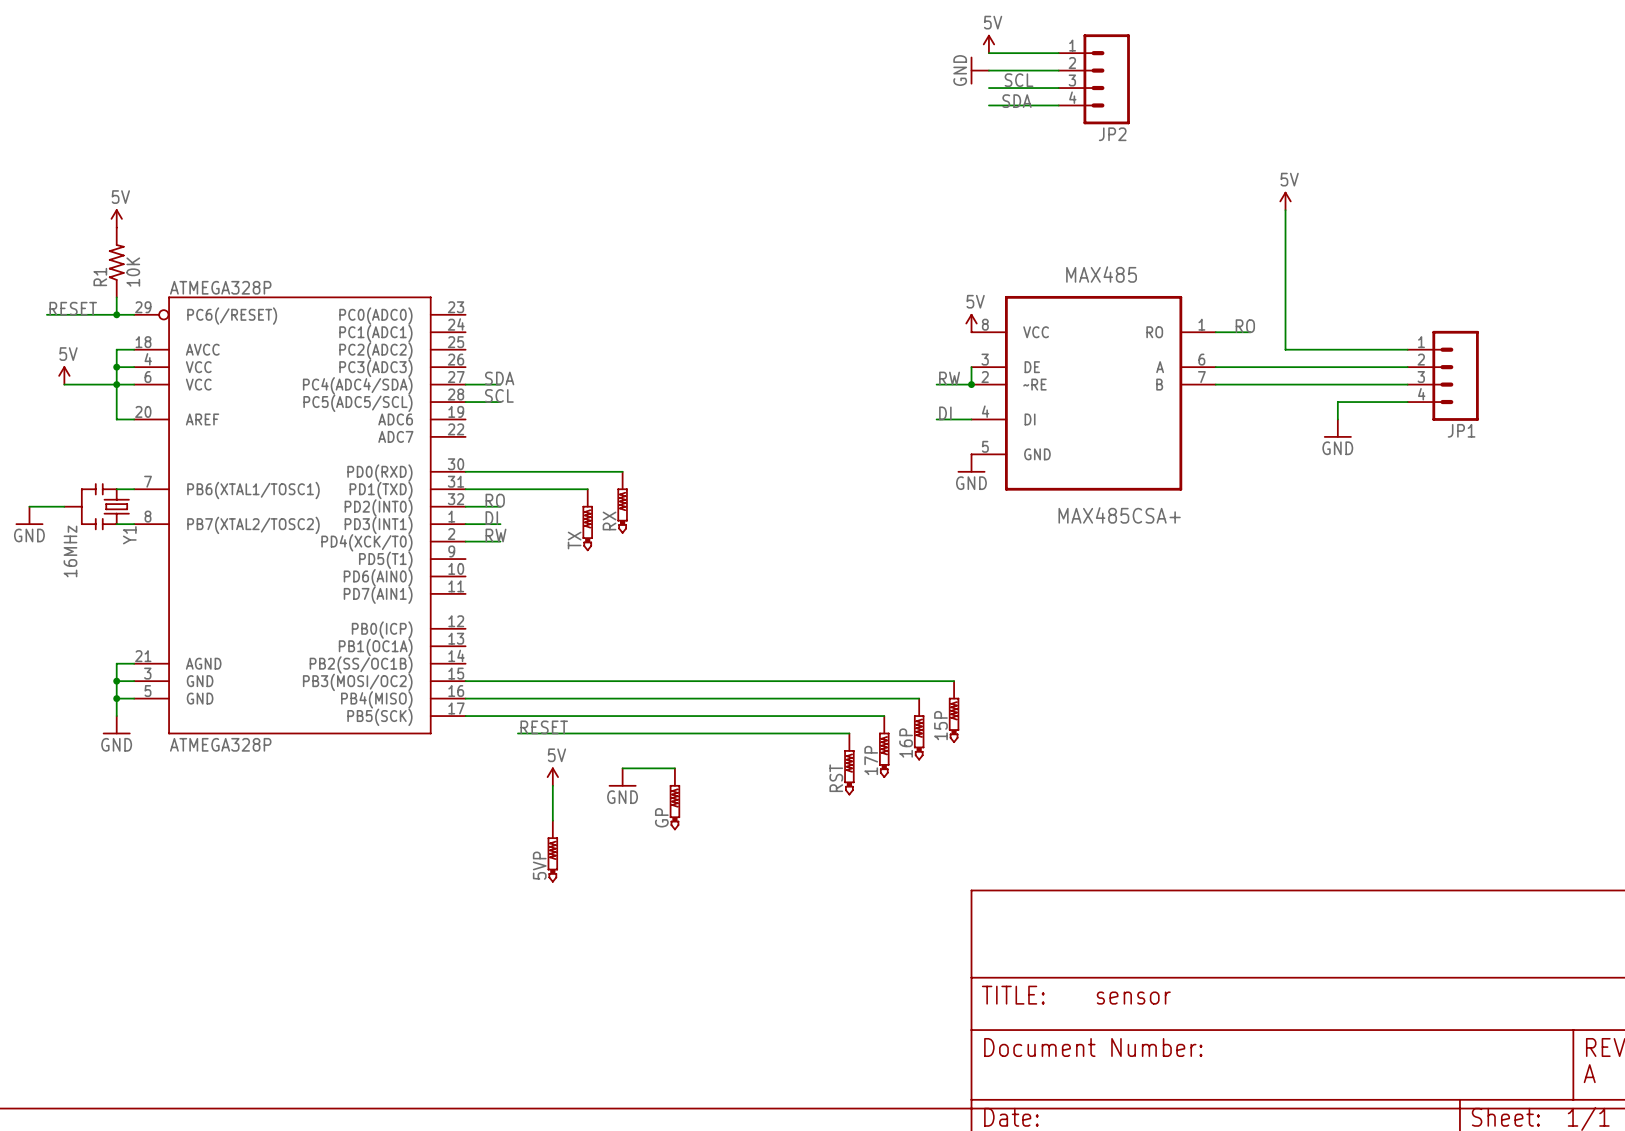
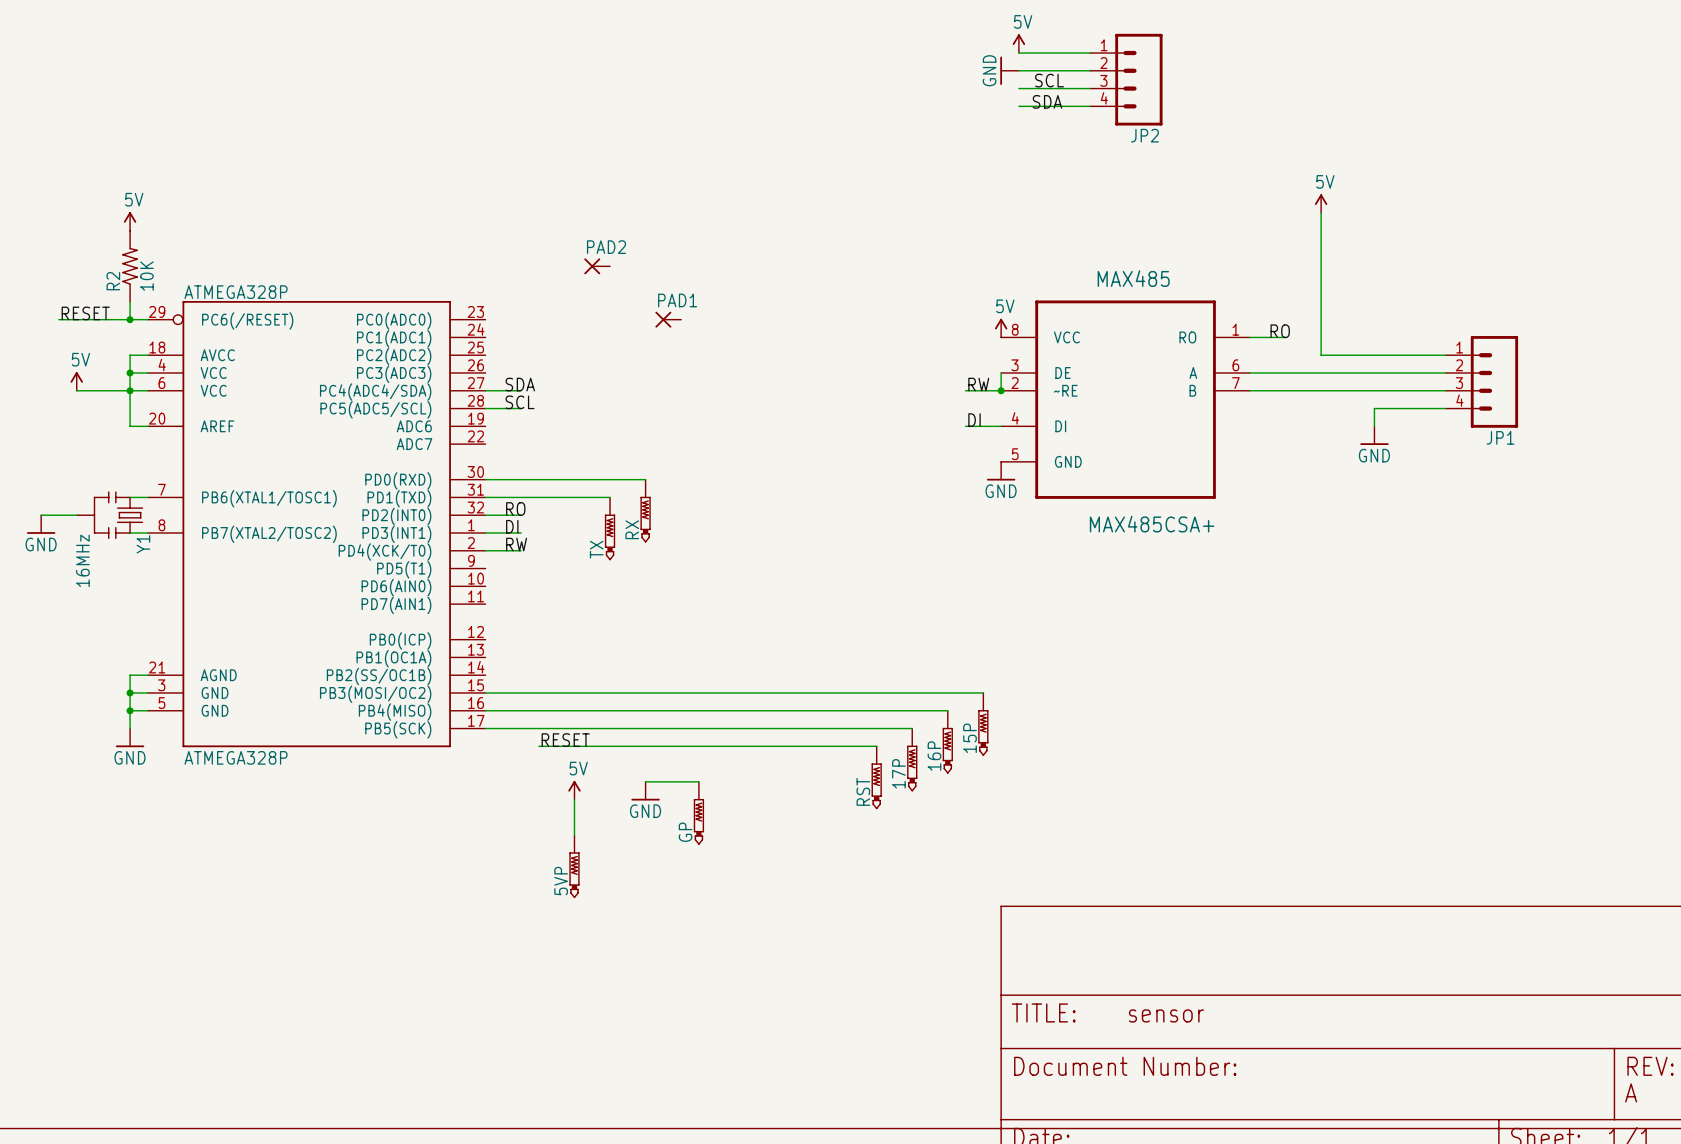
PAD2: none -> (597, 266)
R1 name: R1 (100, 277) -> R2 (113, 281)
PAD1: none -> (668, 319)

